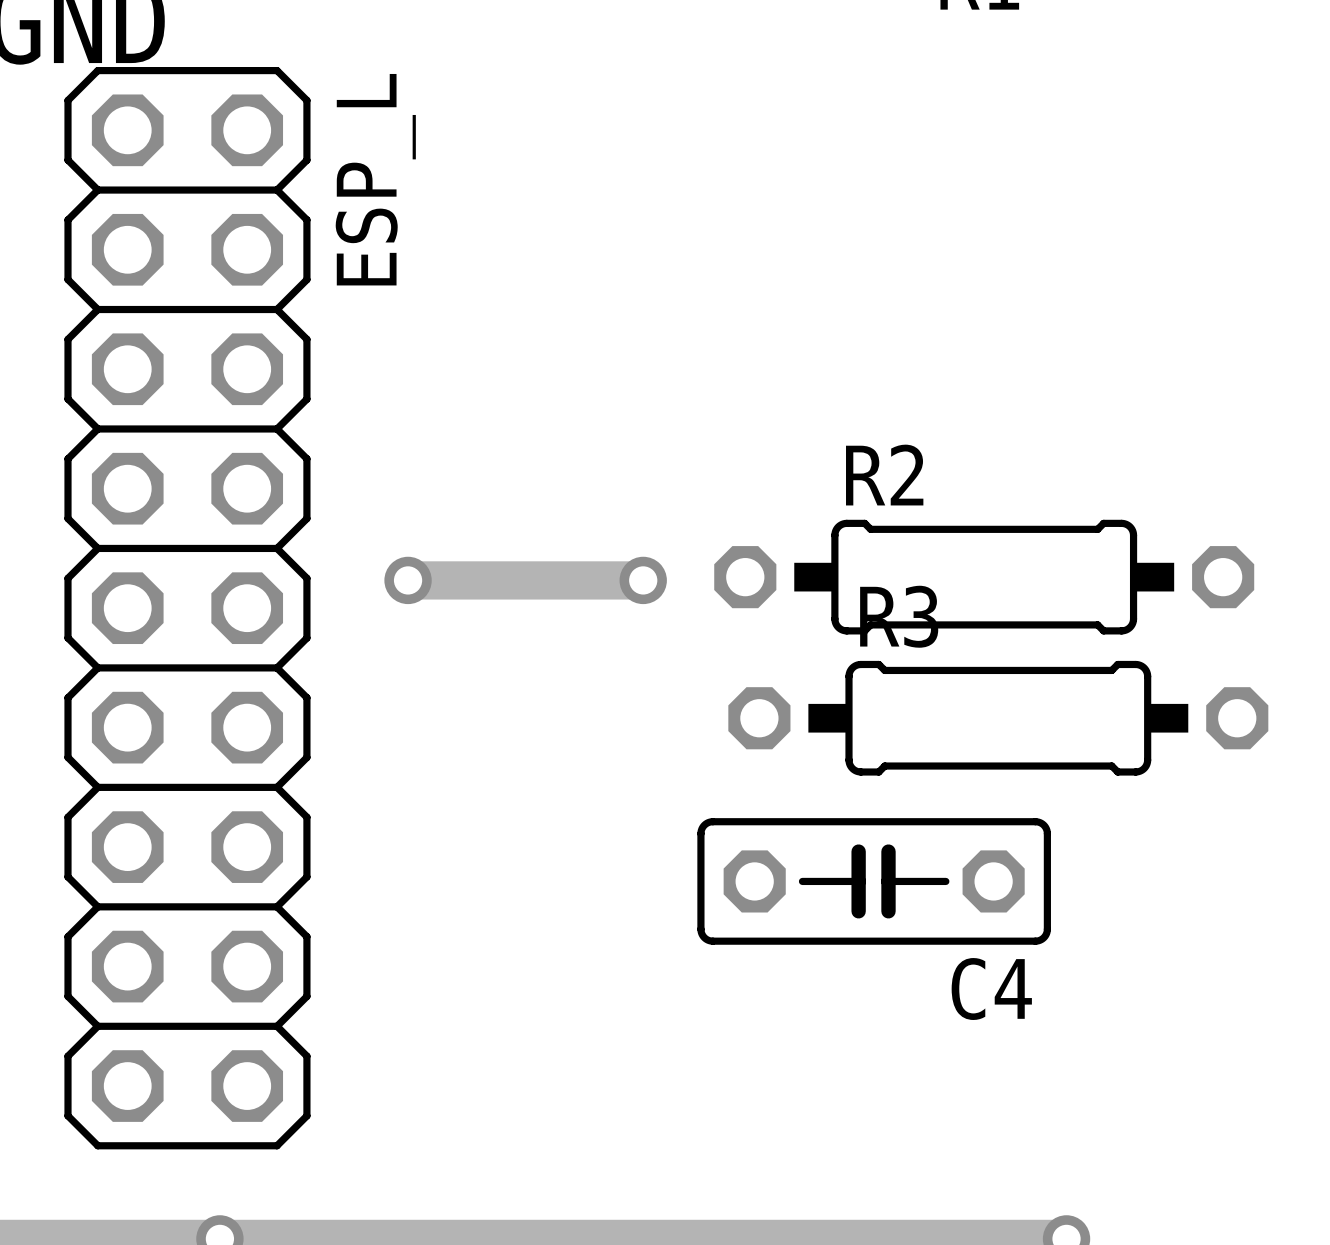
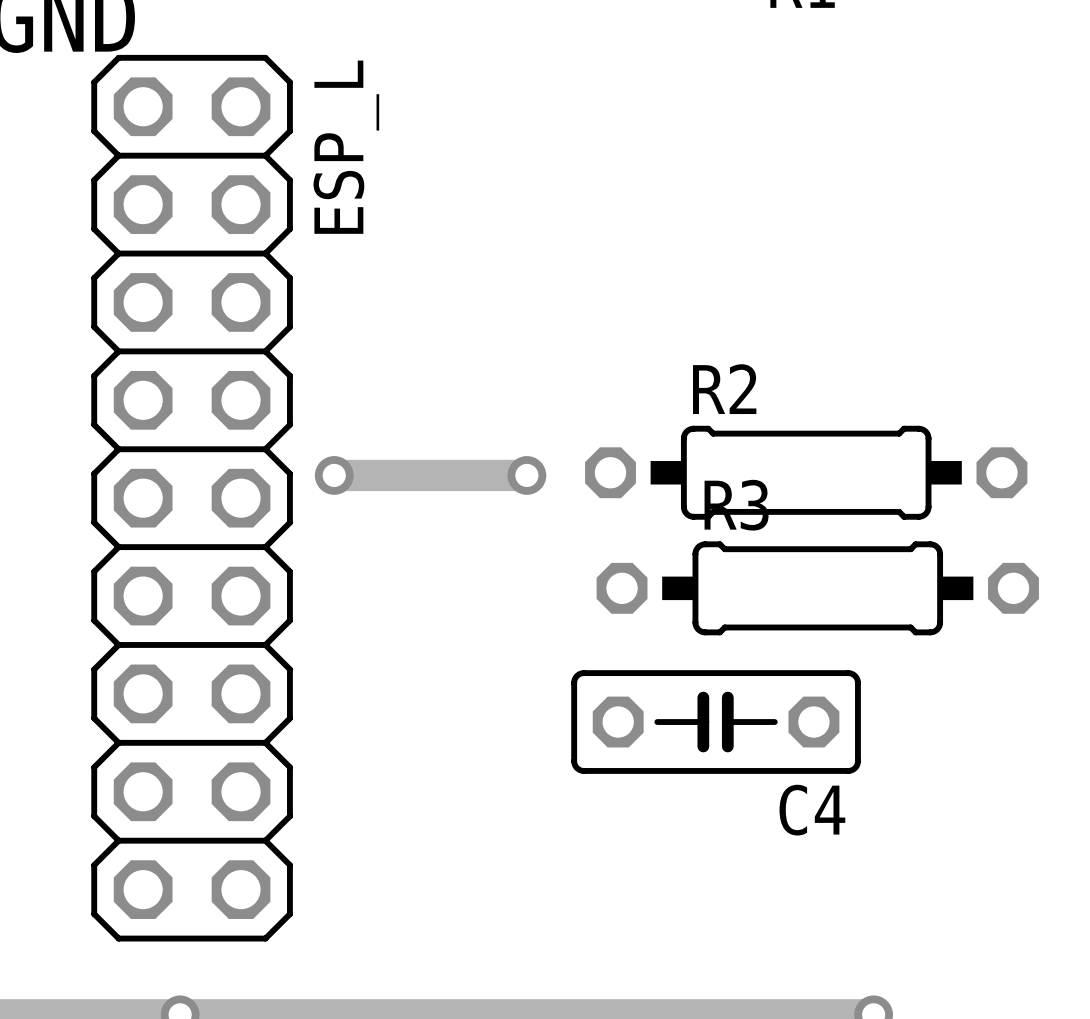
ESP_L position: (187, 608) -> (192, 498)

